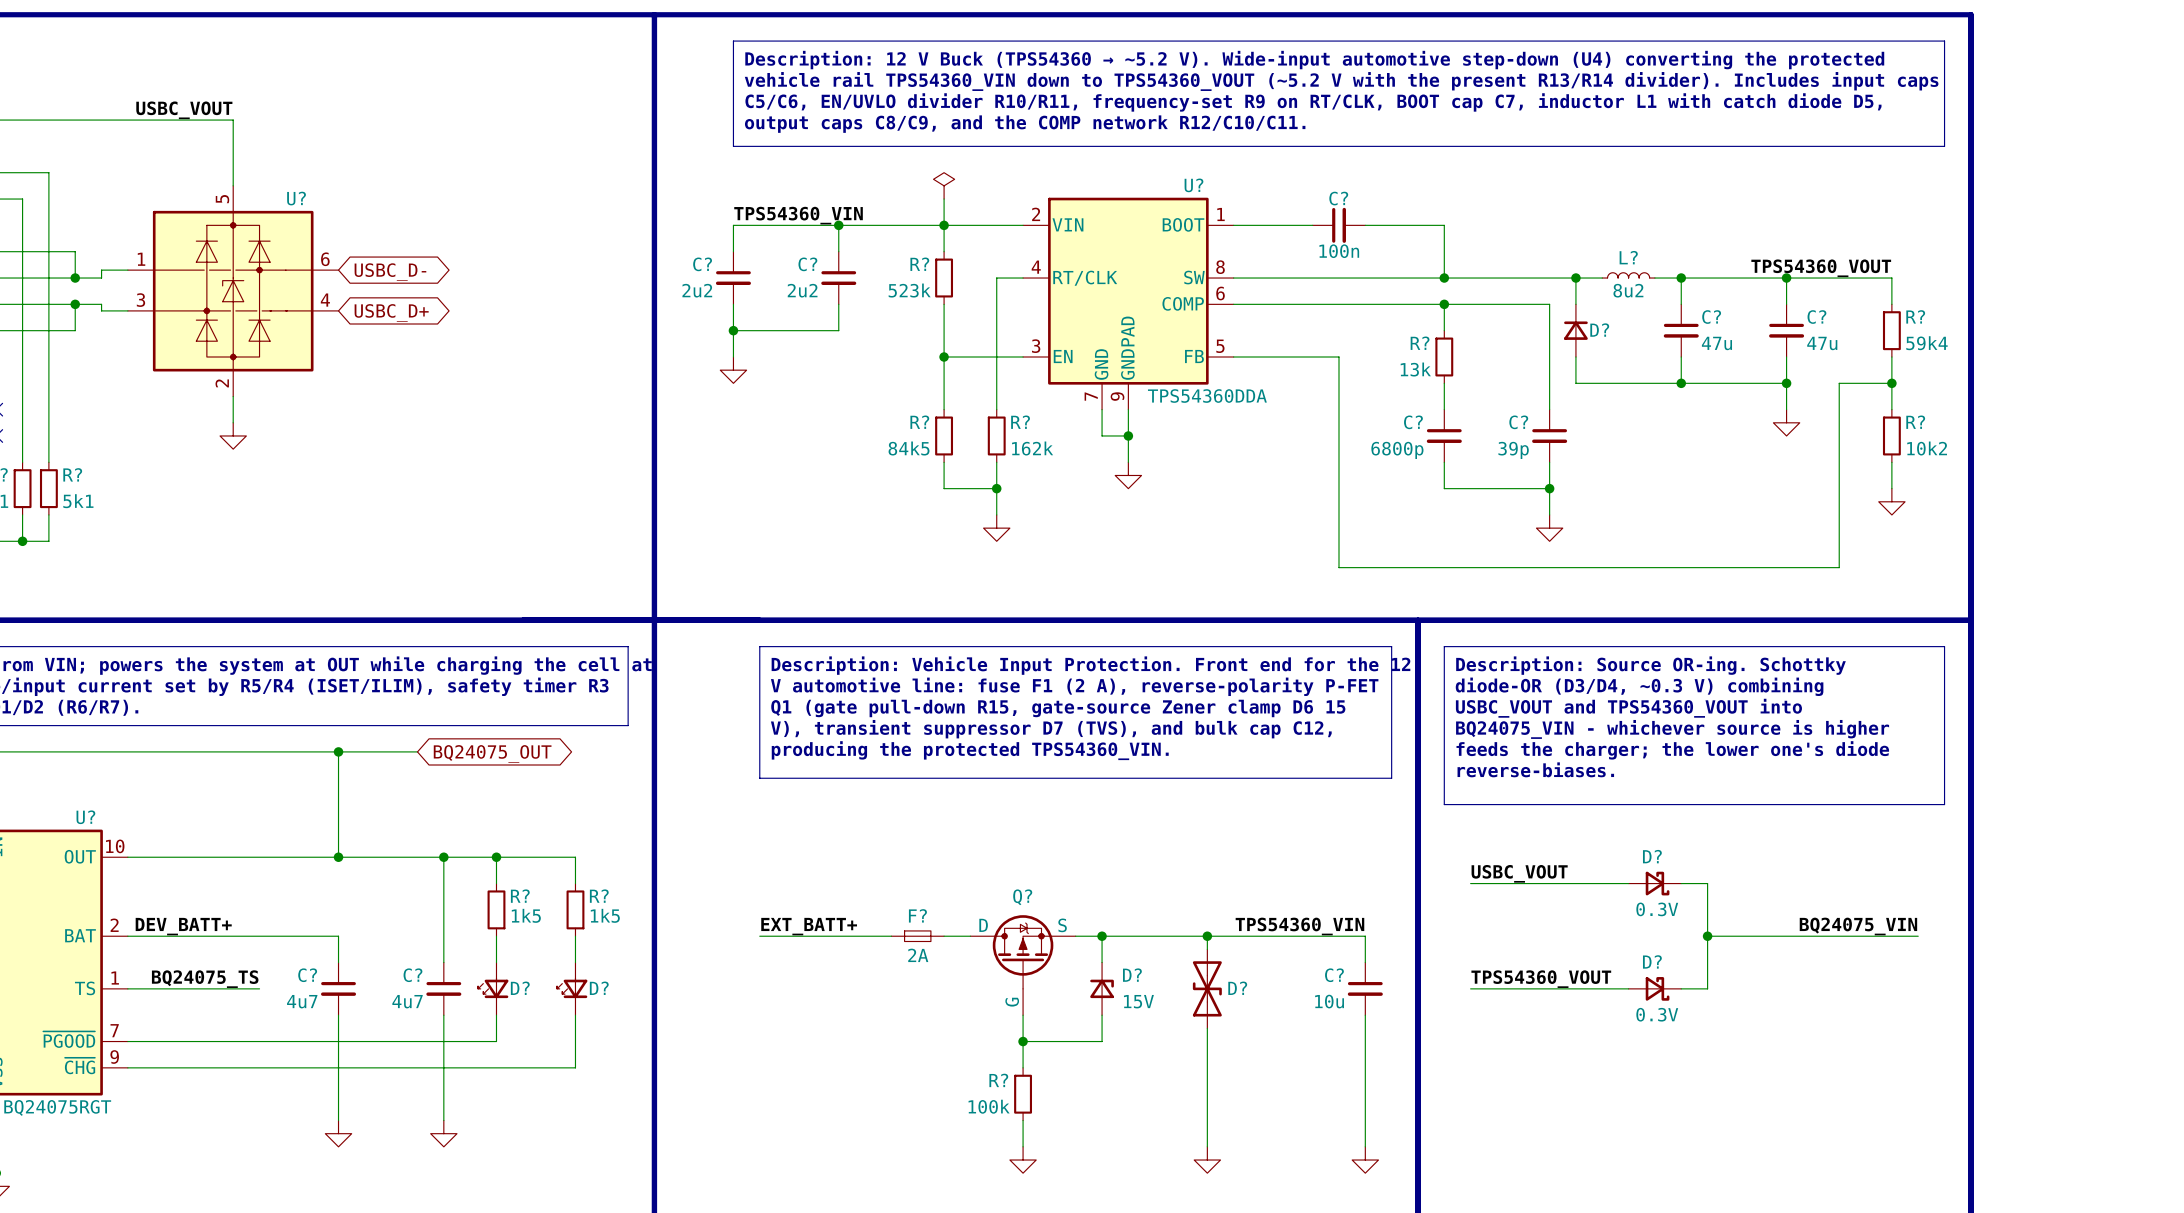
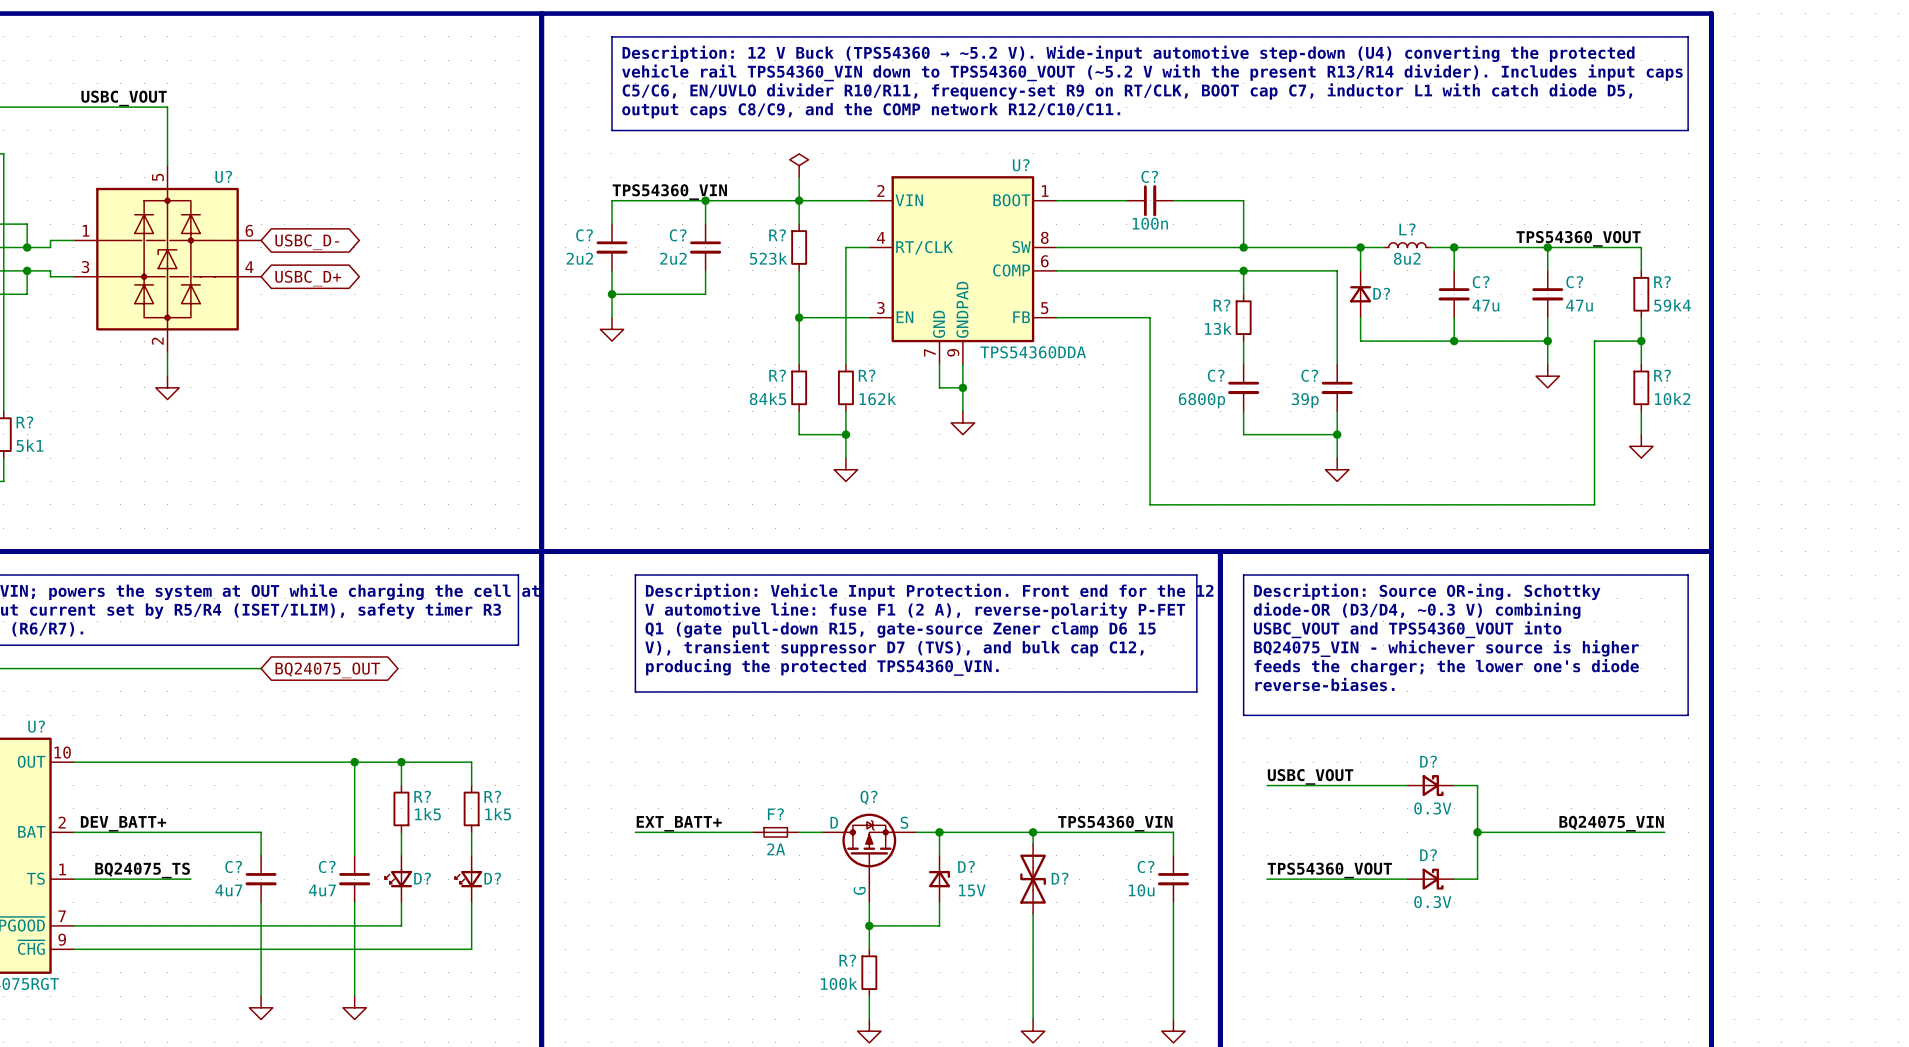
junction: (338, 751) -> none
wire: (417, 751) (338, 751) (338, 857) -> none
global label position: BQ24075_OUT (492, 753) -> BQ24075_OUT (327, 670)
junction: (338, 857) -> none

